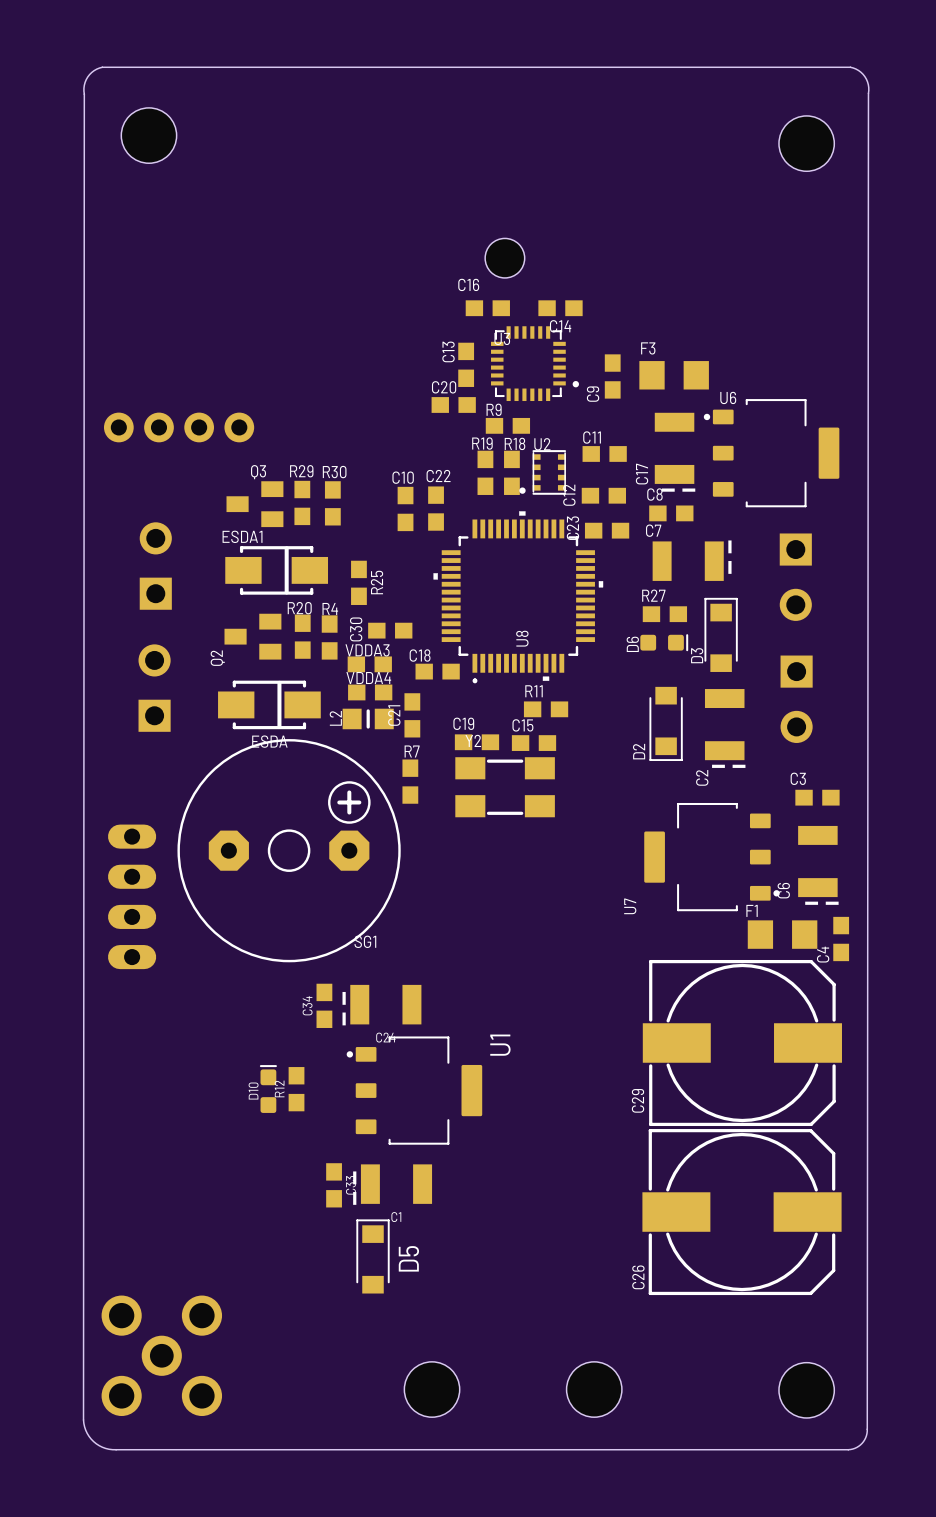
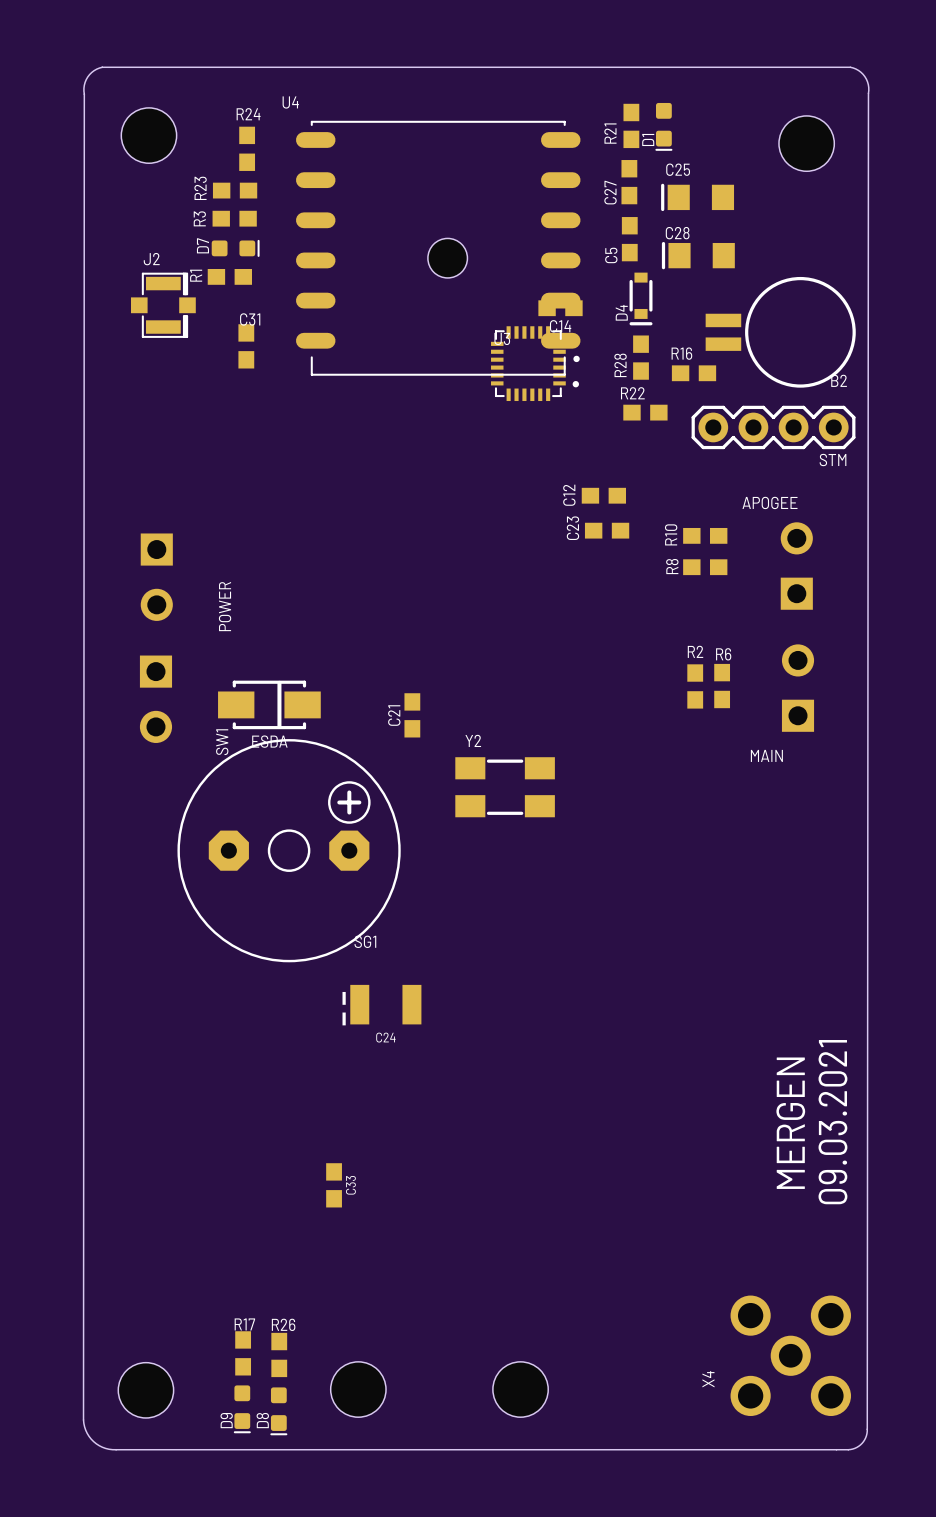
R21: none -> (631, 125)
D1: none -> (663, 126)
R24: none -> (247, 148)
C27: none -> (629, 182)
R23: none -> (235, 190)
C25: none -> (697, 197)
R3: none -> (234, 218)
C5: none -> (629, 239)
D7: none -> (235, 248)
U4: none -> (438, 248)
C28: none -> (698, 255)
hole position: (504, 258) -> (447, 258)
R1: none -> (229, 276)
D4: none -> (641, 298)
J2: none -> (163, 305)
C16: (487, 308) -> none
B2: none -> (780, 332)
C31: none -> (246, 346)
R28: none -> (641, 357)
C13: (466, 364) -> none
R16: none -> (694, 373)
F3: (674, 375) -> none
C9: (612, 376) -> none
C20: (453, 404) -> none
R22: none -> (645, 412)
R9: (507, 425) -> none
part: (179, 427) -> none
STM: none -> (773, 427)
line: (533, 452) (533, 491) -> none
line: (565, 452) (565, 492) -> none
C17: (674, 452) -> none
C11: (604, 453) -> none
U6: (771, 453) -> none
R19: (485, 472) -> none
R18: (511, 472) -> none
U2: (542, 472) -> none
R29: (302, 502) -> none
R30: (332, 503) -> none
Q3: (254, 504) -> none
C10: (405, 508) -> none
C22: (436, 508) -> none
C8: (671, 513) -> none
R10: none -> (705, 535)
C7: (692, 560) -> none
part: (155, 566) -> none
APOGEE: none -> (796, 566)
R8: none -> (705, 567)
ESDA1: (276, 570) -> none
POWER: none -> (156, 577)
part: (795, 577) -> none
R25: (358, 582) -> none
U8: (518, 597) -> none
R27: (664, 614) -> none
C30: (390, 630) -> none
D3: (721, 634) -> none
Q2: (252, 636) -> none
R20: (302, 636) -> none
R4: (329, 637) -> none
D6: (664, 642) -> none
VDDA3: (369, 664) -> none
C18: (437, 671) -> none
R2: none -> (695, 686)
R6: none -> (722, 686)
part: (154, 688) -> none
MAIN: none -> (798, 688)
VDDA4: (370, 692) -> none
SW1: none -> (155, 699)
part: (796, 699) -> none
R11: (546, 709) -> none
L2: (368, 718) -> none
D2: (666, 723) -> none
C2: (724, 728) -> none
C19: (476, 742) -> none
C15: (534, 743) -> none
R7: (410, 781) -> none
C3: (817, 797) -> none
U7: (711, 857) -> none
C6: (818, 865) -> none
part: (132, 896) -> none
F1: (782, 934) -> none
C4: (841, 939) -> none
C34: (324, 1005) -> none
C29: (742, 1042) -> none
D10: (268, 1089) -> none
R12: (296, 1089) -> none
U1: (414, 1090) -> none
text: none -> 09.03.2021 (832, 1122)
text: none -> MERGEN (790, 1123)
C1: (392, 1184) -> none
C26: (741, 1212) -> none
D5: (373, 1256) -> none
R17: none -> (243, 1353)
R26: none -> (279, 1354)
part: (161, 1355) -> none
X4: none -> (790, 1355)
hole: none -> (358, 1389)
hole: (432, 1389) -> none
hole: none -> (520, 1389)
hole: (594, 1389) -> none
hole: none -> (145, 1390)
hole: (806, 1390) -> none
D9: none -> (242, 1409)
D8: none -> (278, 1411)

